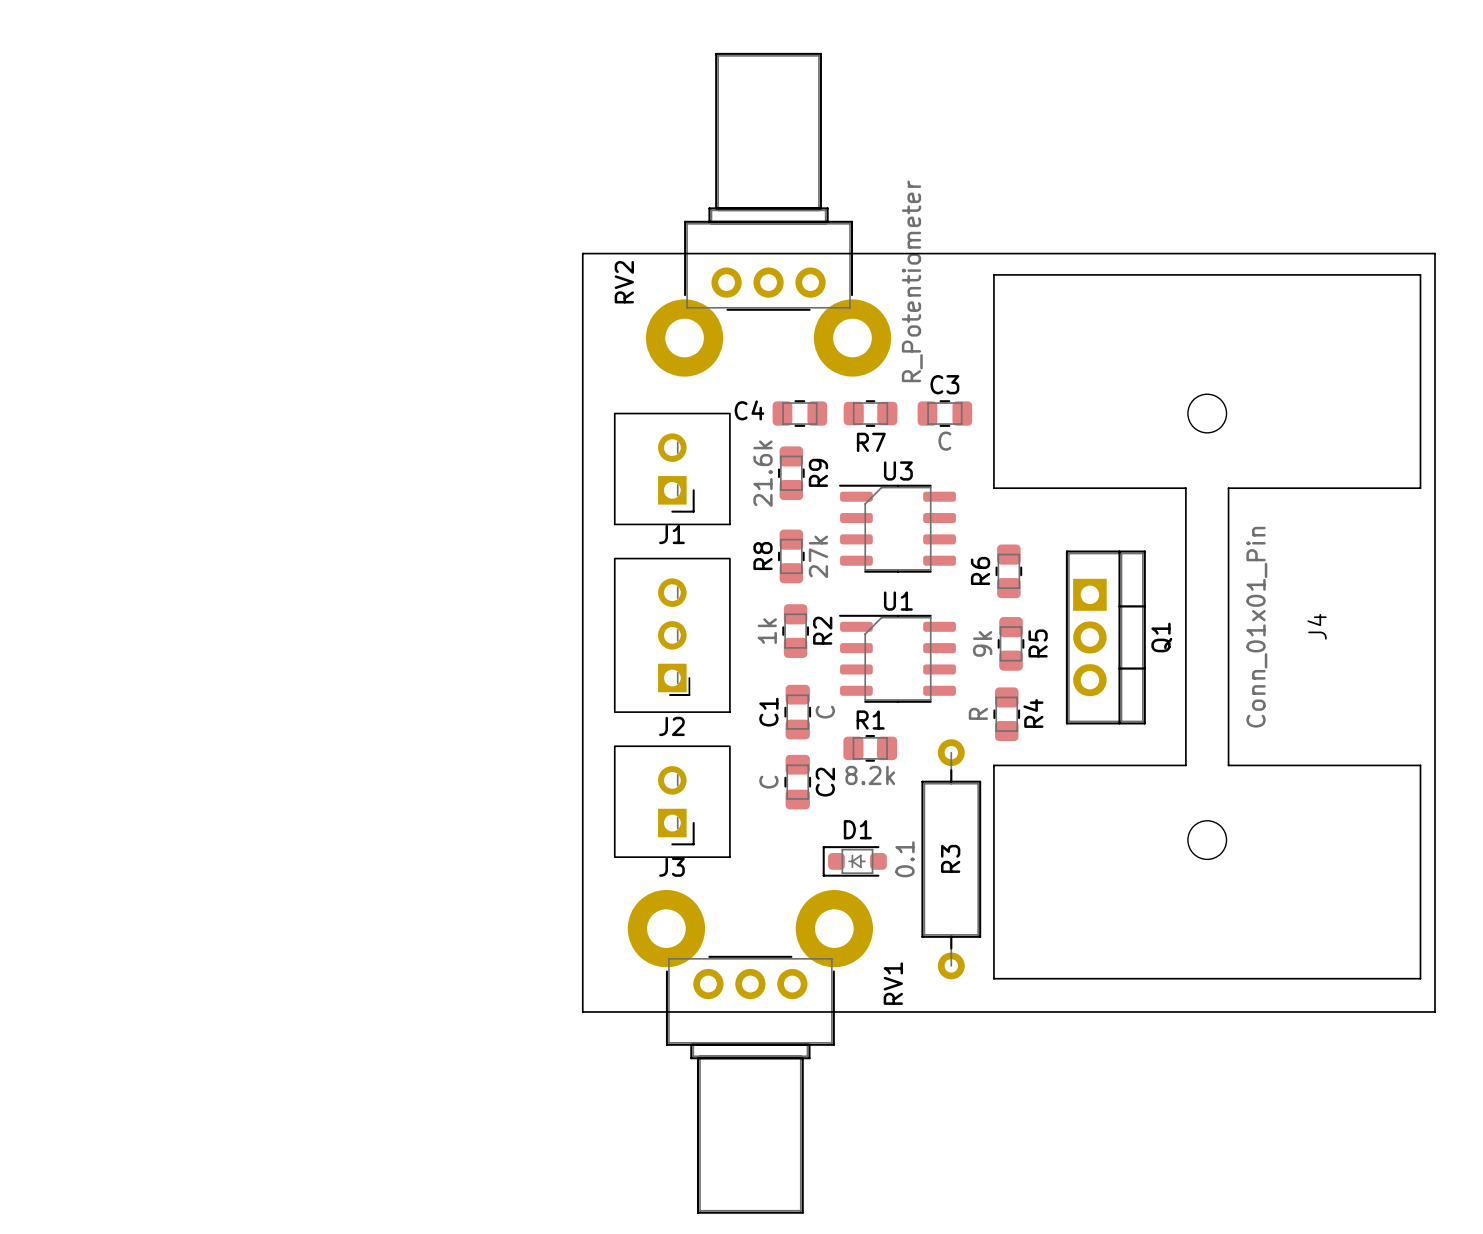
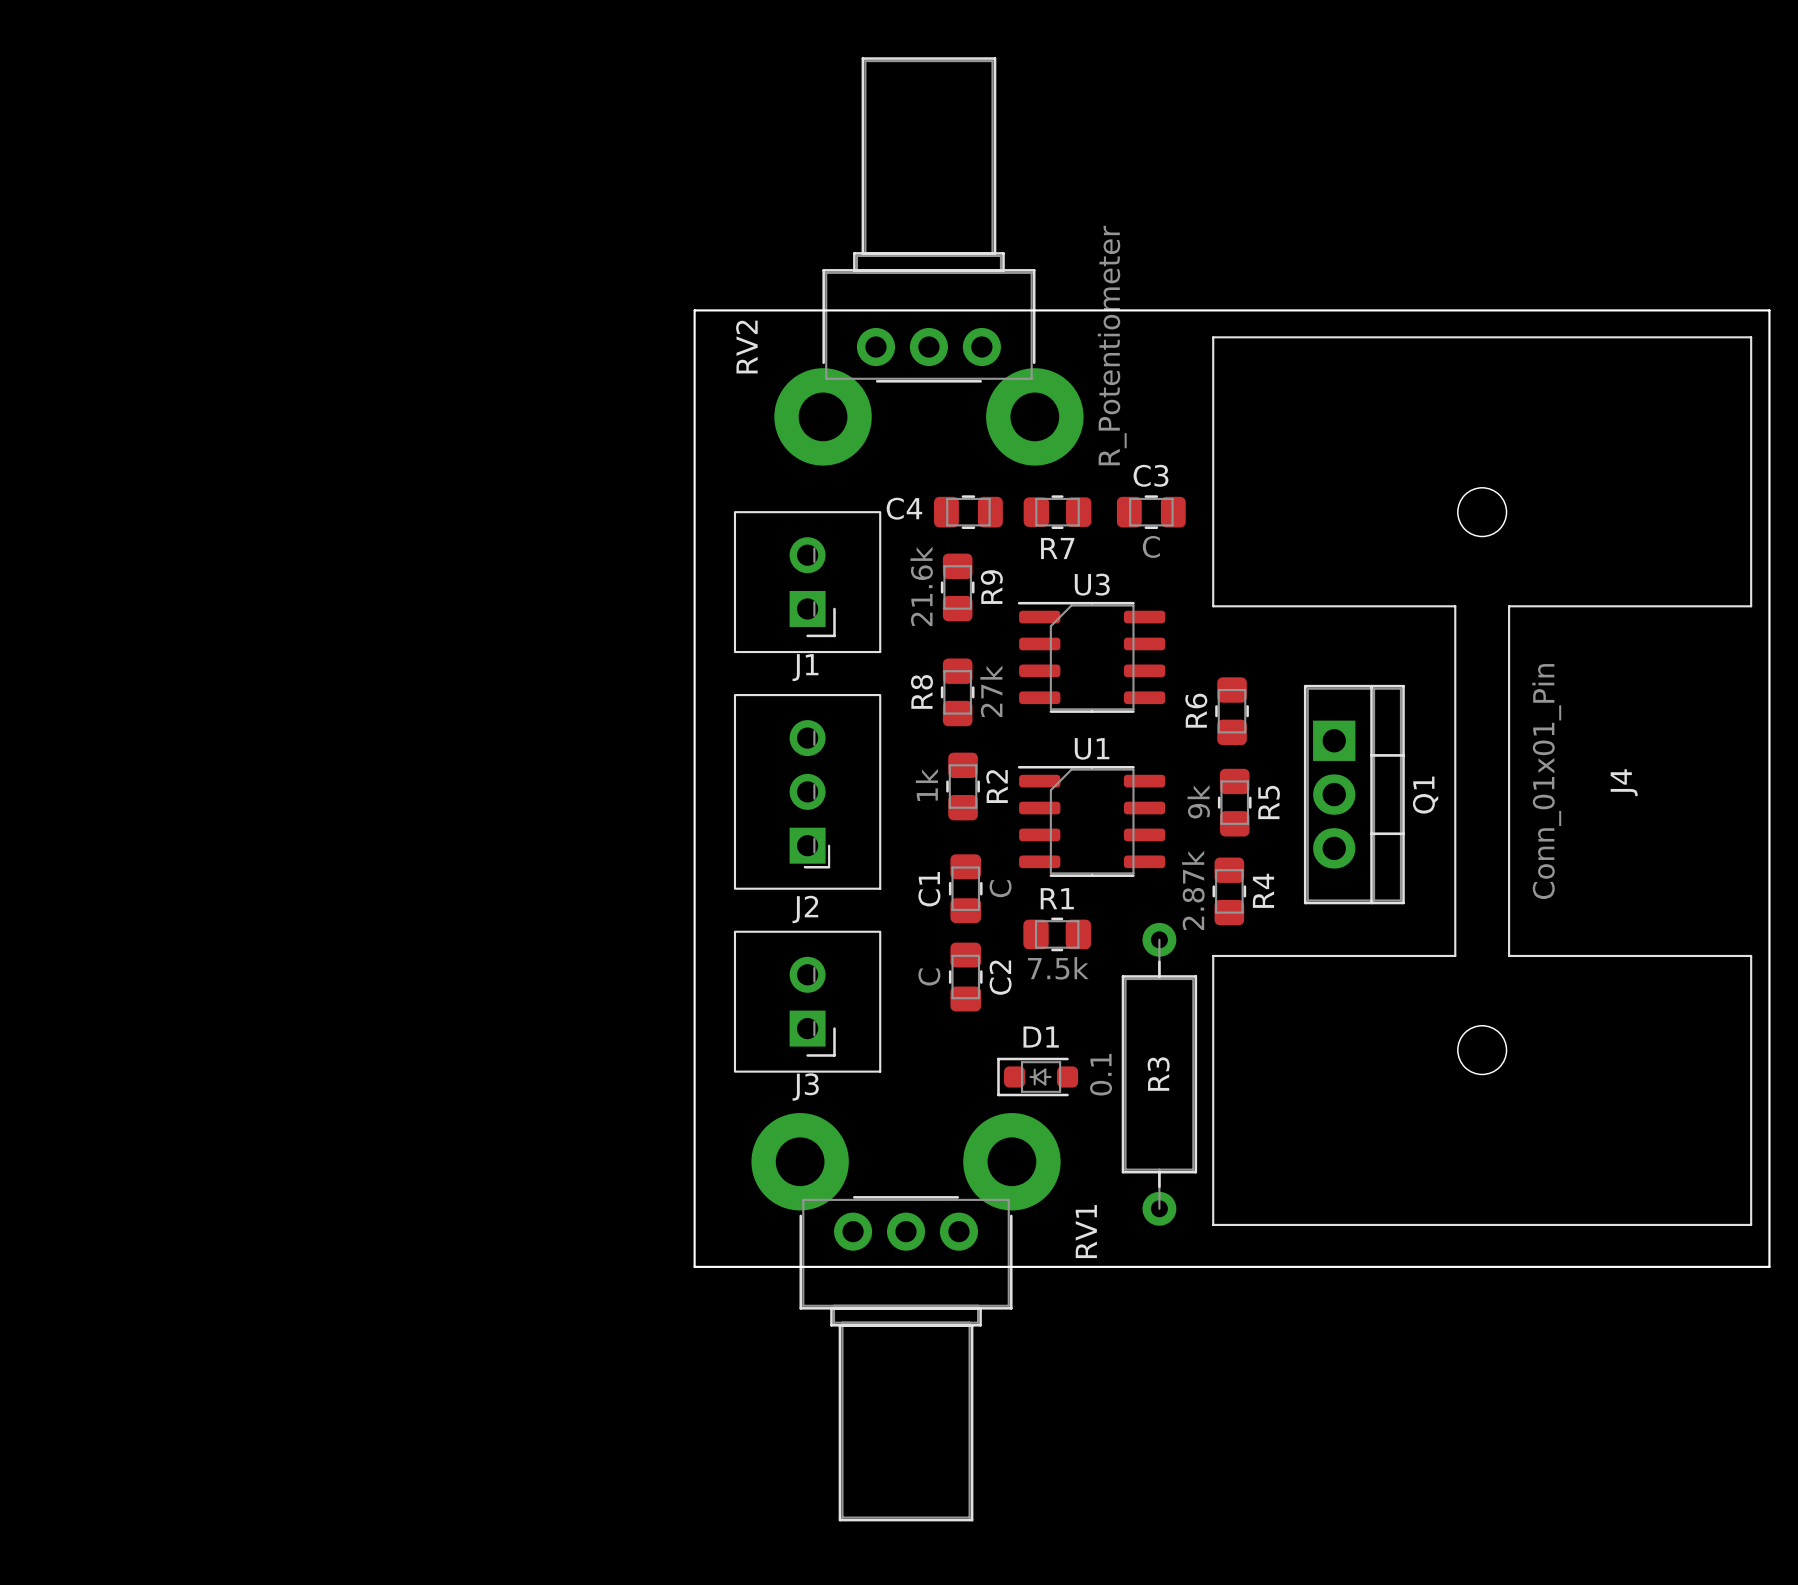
R4 value: R (978, 713) -> 2.87k (1193, 890)
R1 value: 8.2k (870, 775) -> 7.5k (1058, 968)

